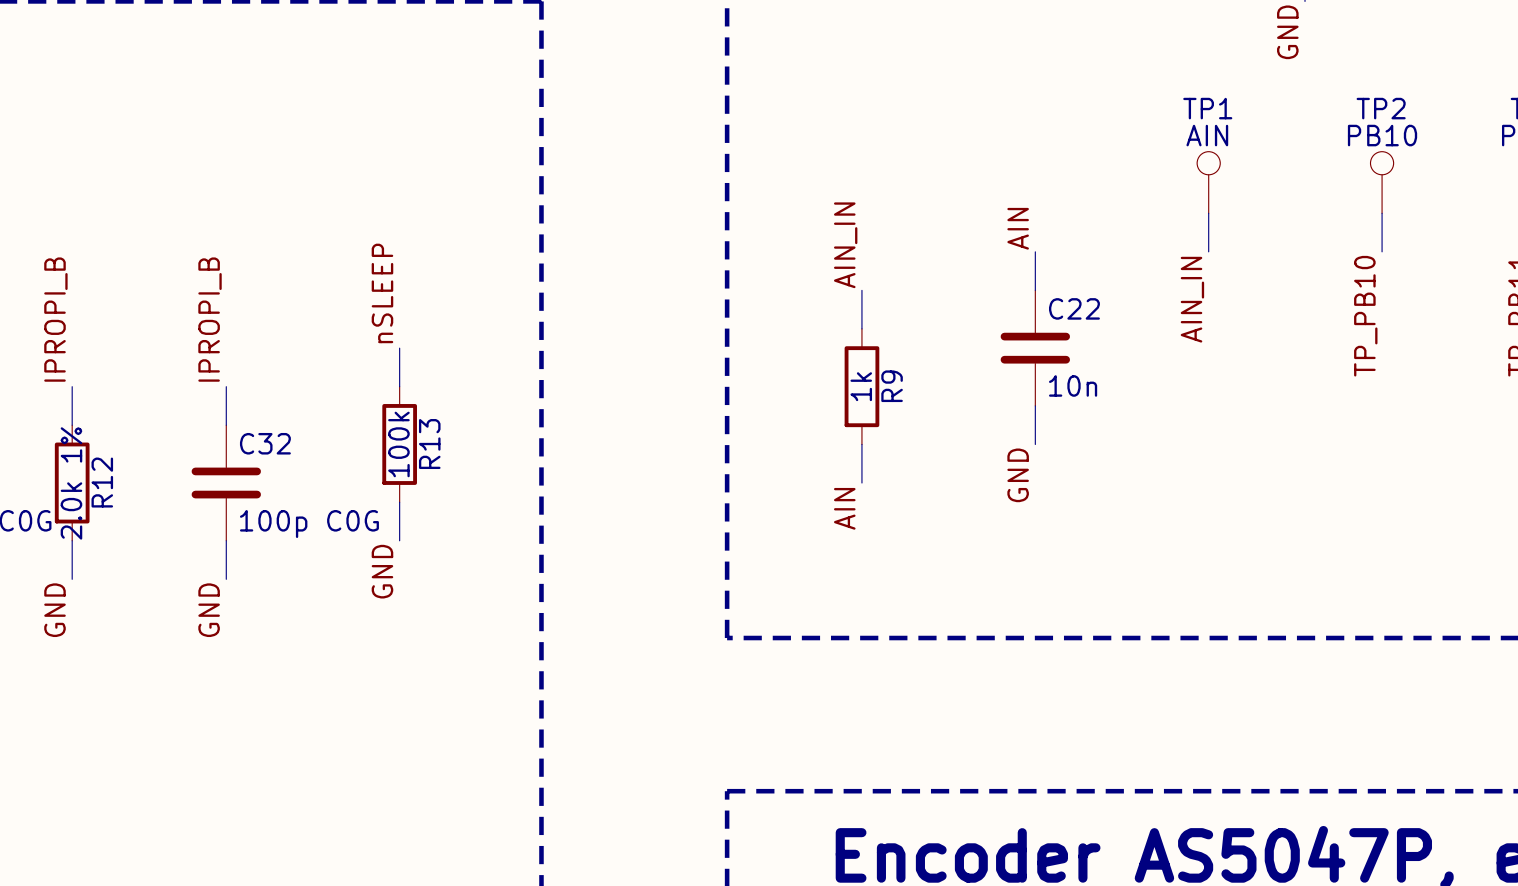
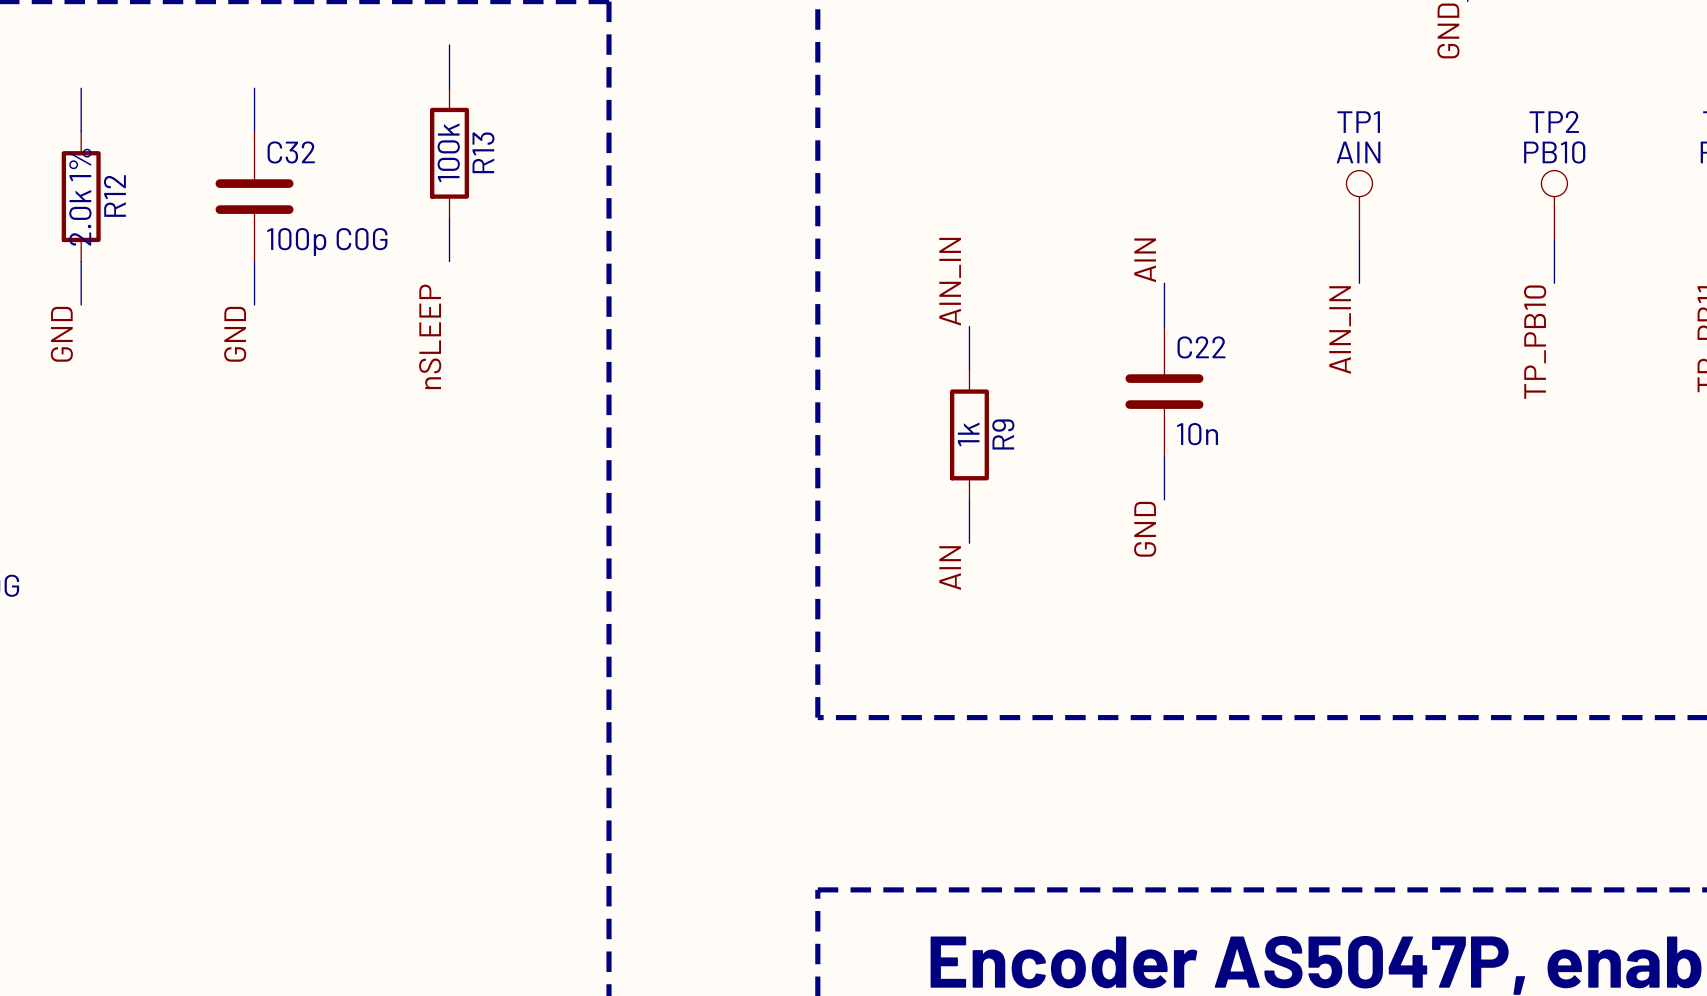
label: none -> GND (61, 334)
label: none -> GND (235, 334)
label: IPROPI_B (55, 319) -> none
label: IPROPI_B (210, 319) -> none
wire: (399, 348) (399, 386) -> (449, 44) (449, 88)
wire: (72, 386) (72, 425) -> (81, 88) (81, 131)
wire: (226, 386) (226, 425) -> (254, 88) (254, 131)
R13 position: (399, 444) -> (449, 153)
R12 position: (72, 483) -> (81, 196)
C32 position: (226, 483) -> (254, 196)
wire: (399, 502) (399, 540) -> (449, 218) (449, 261)
wire: (72, 540) (72, 579) -> (81, 261) (81, 304)
wire: (226, 540) (226, 579) -> (254, 261) (254, 304)
label: GND (382, 571) -> none
label: GND (54, 610) -> none
label: GND (209, 610) -> none

